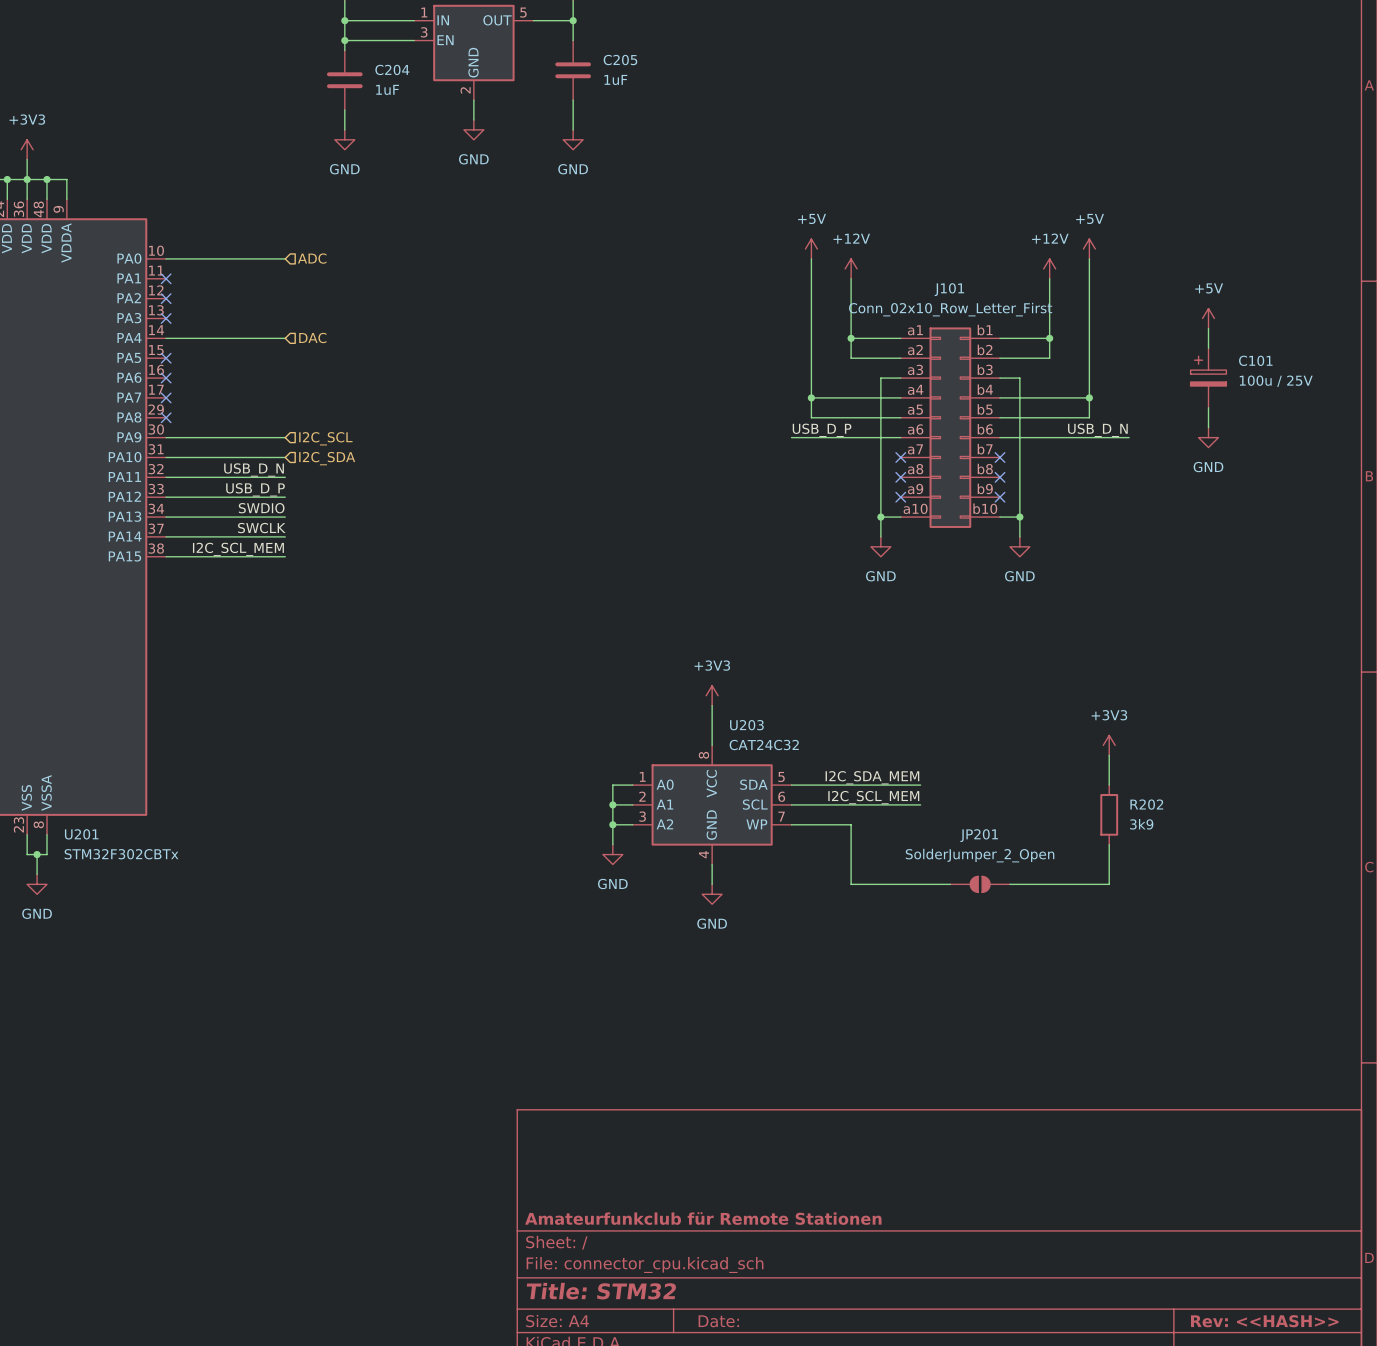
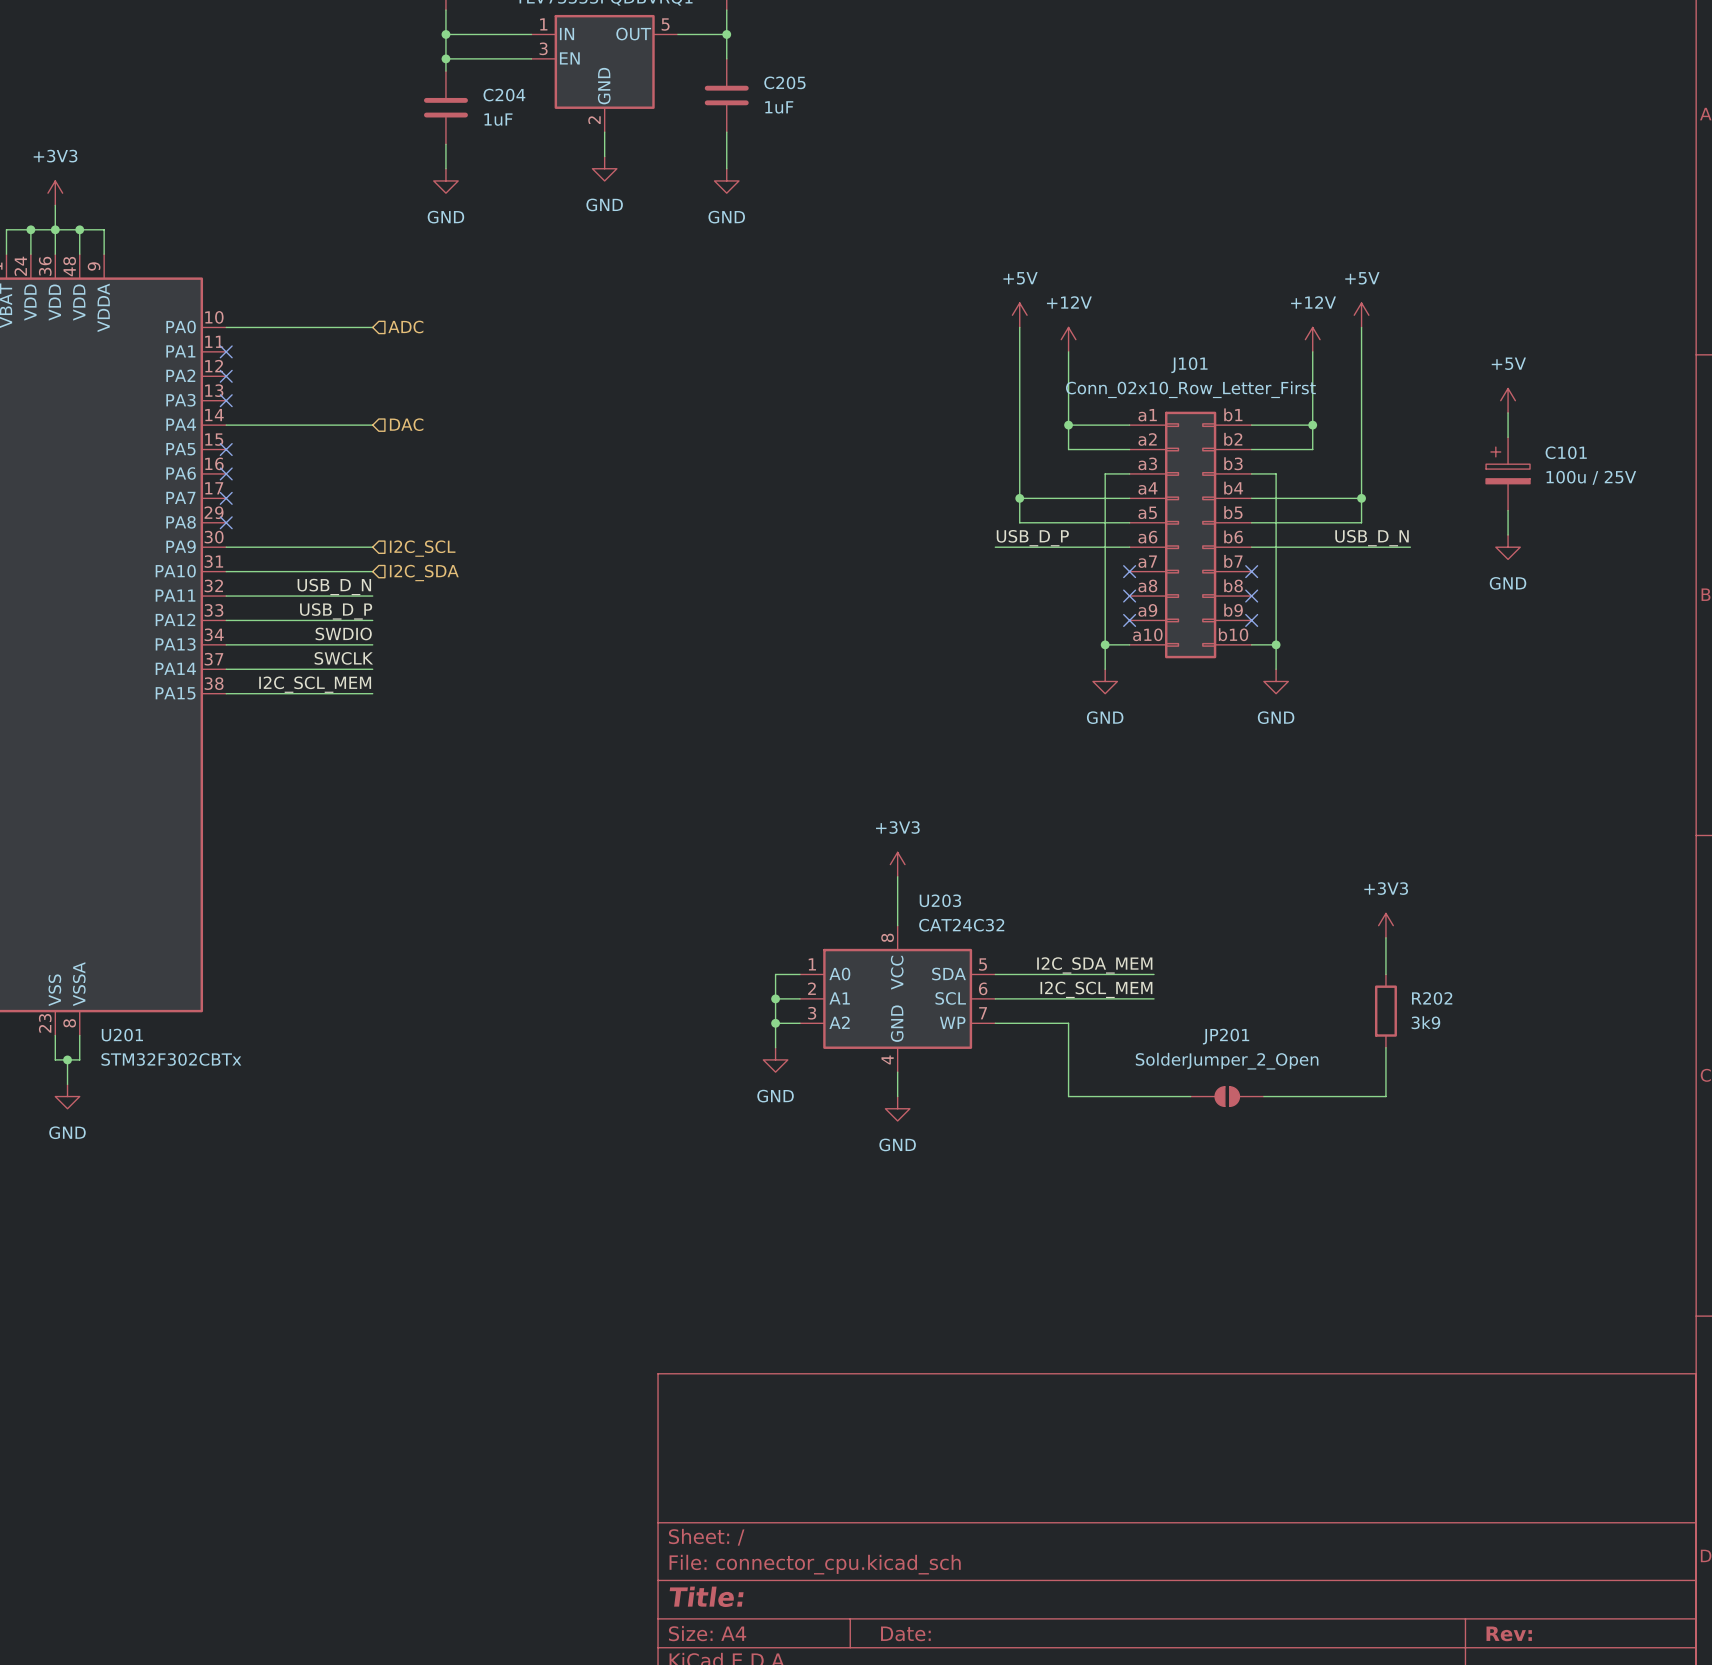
title block: Amateurfunkclub für Remote Stationen (703, 1218) -> none
title block: Title: STM32 (601, 1291) -> Title: (706, 1596)
title block: Rev: <<HASH>> (1264, 1321) -> Rev: (1509, 1633)

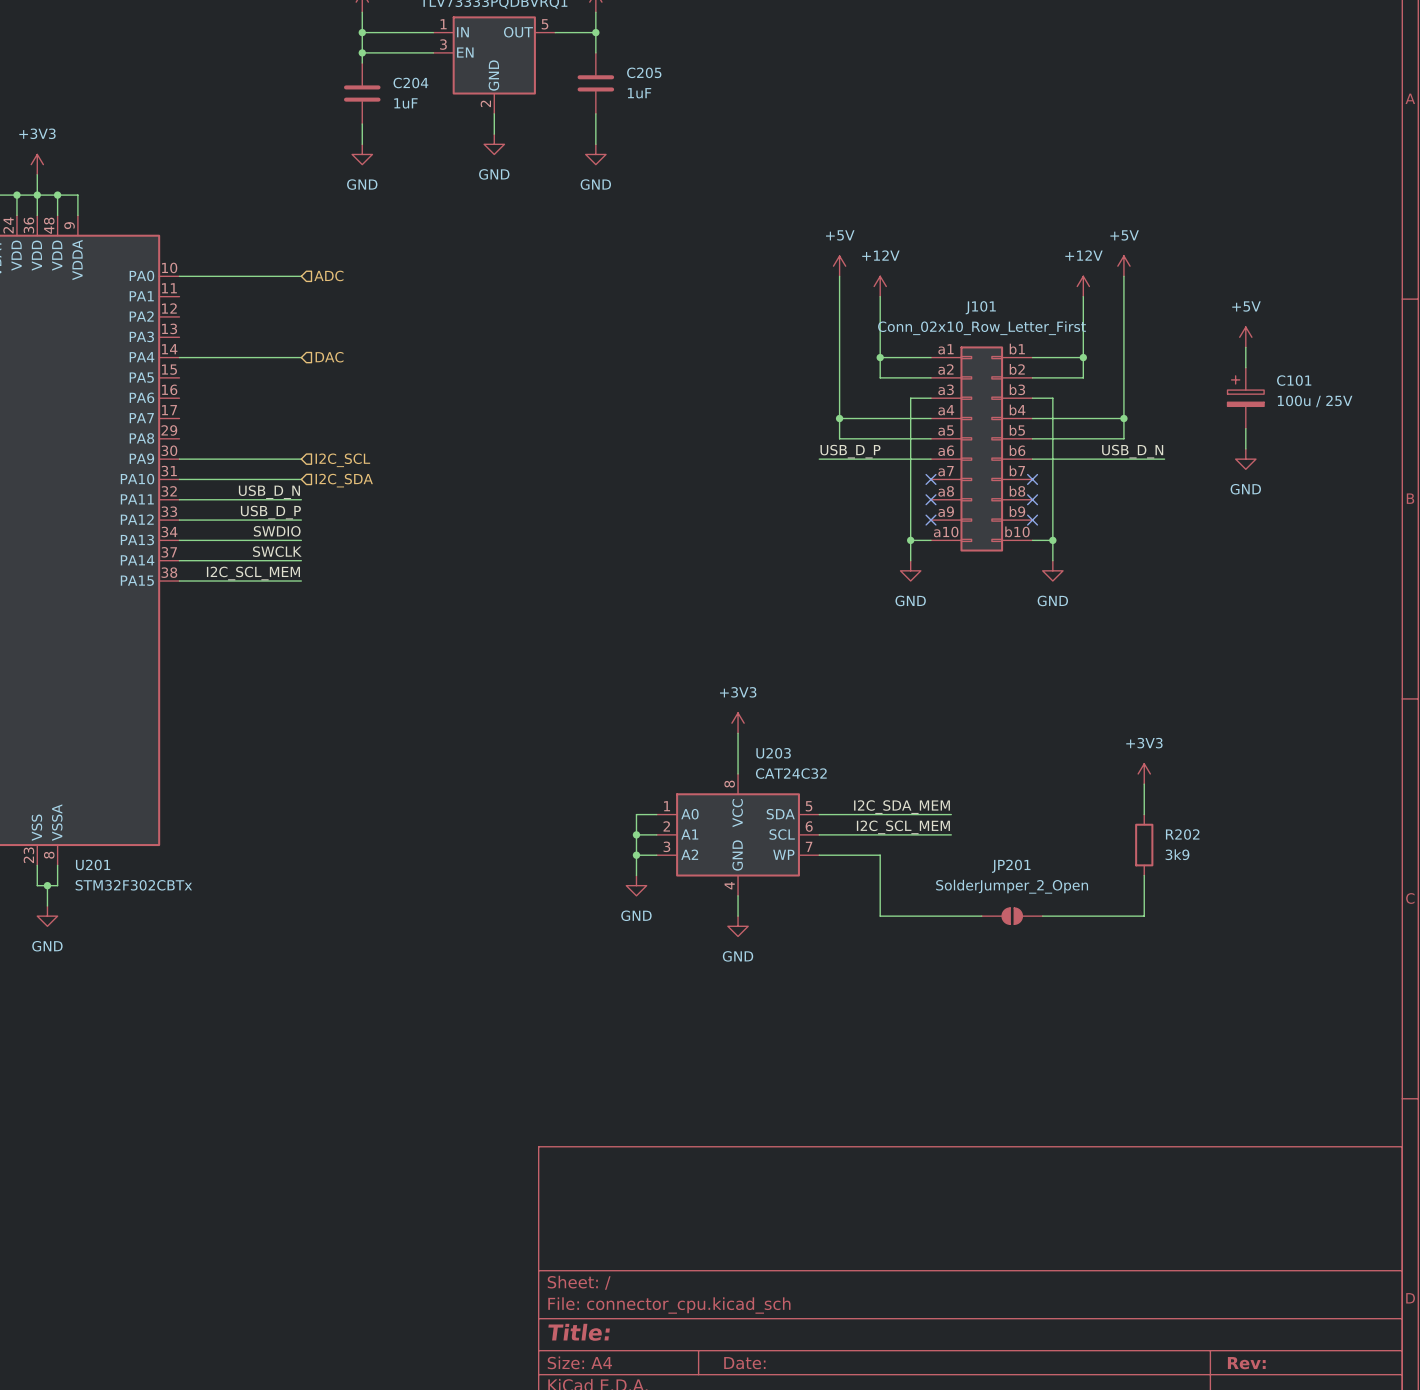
no-connect mark: (226, 351) -> none
no-connect mark: (226, 376) -> none
no-connect mark: (226, 400) -> none
no-connect mark: (226, 449) -> none
no-connect mark: (226, 473) -> none
no-connect mark: (226, 498) -> none
no-connect mark: (226, 522) -> none

